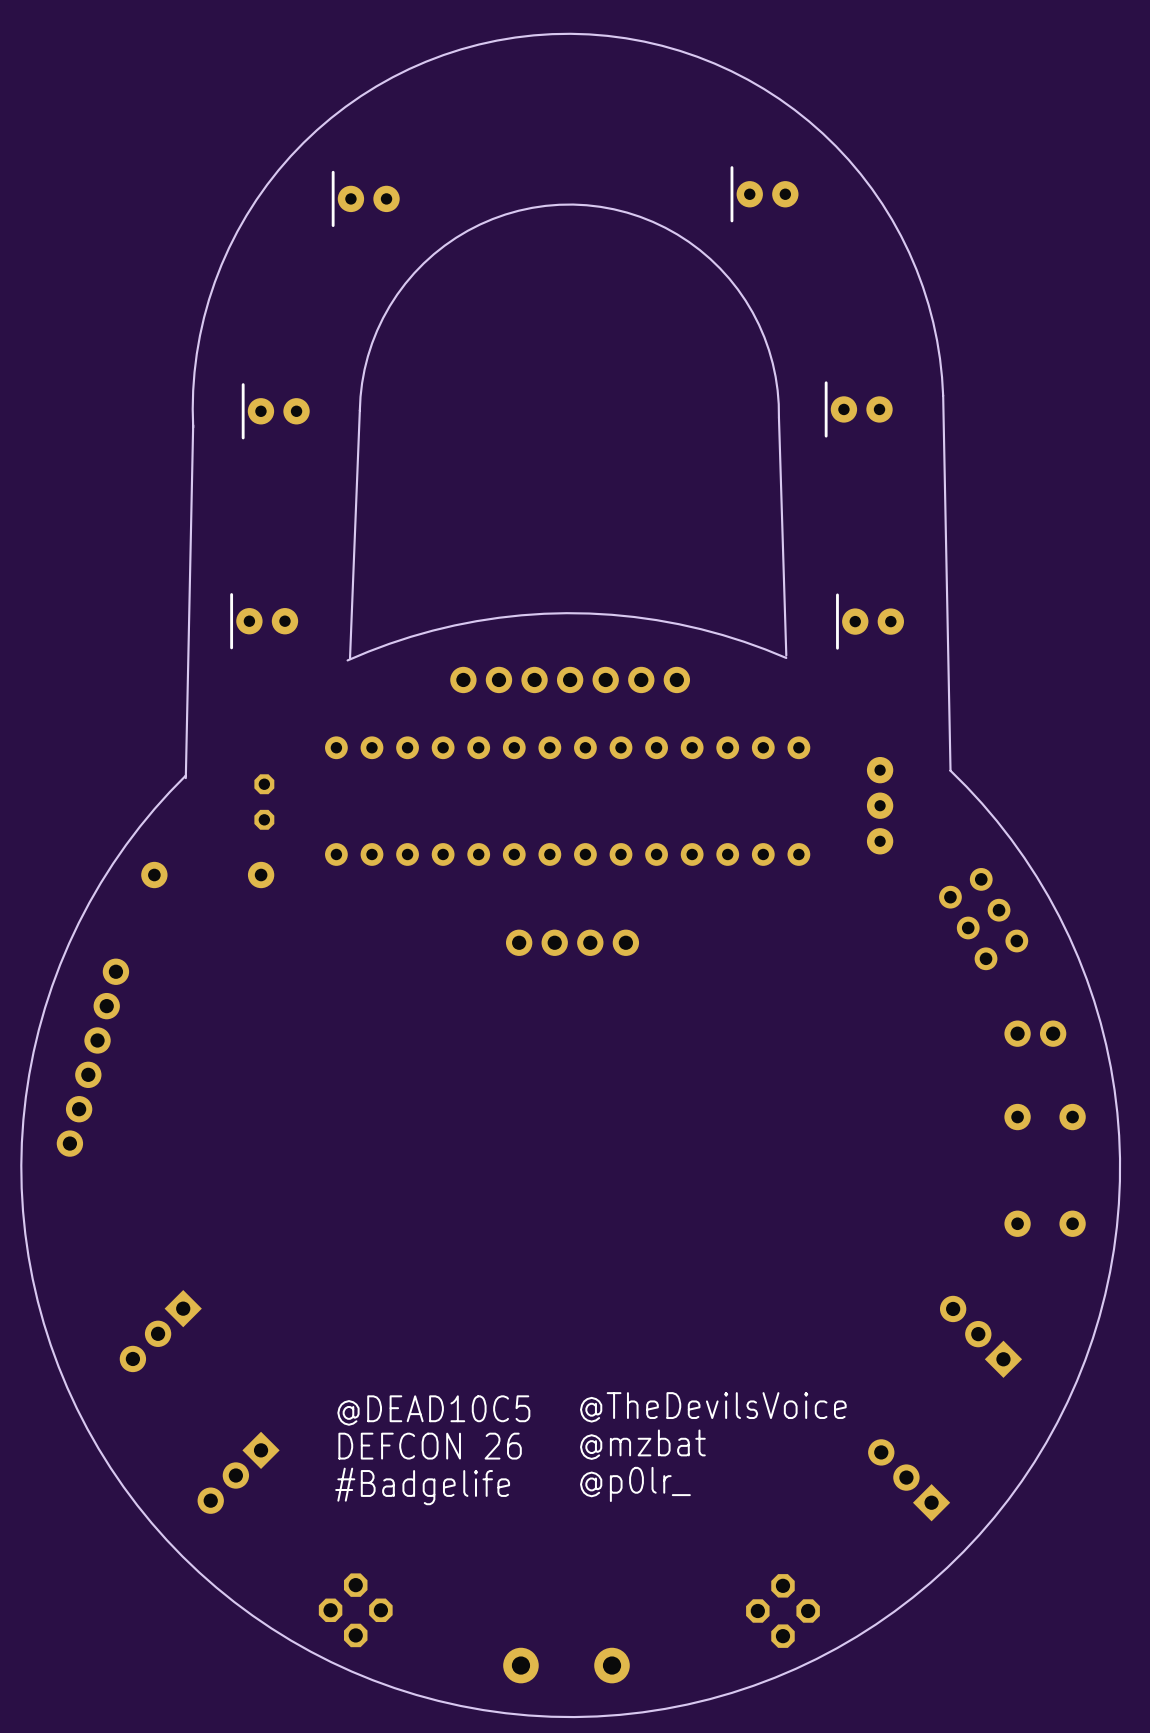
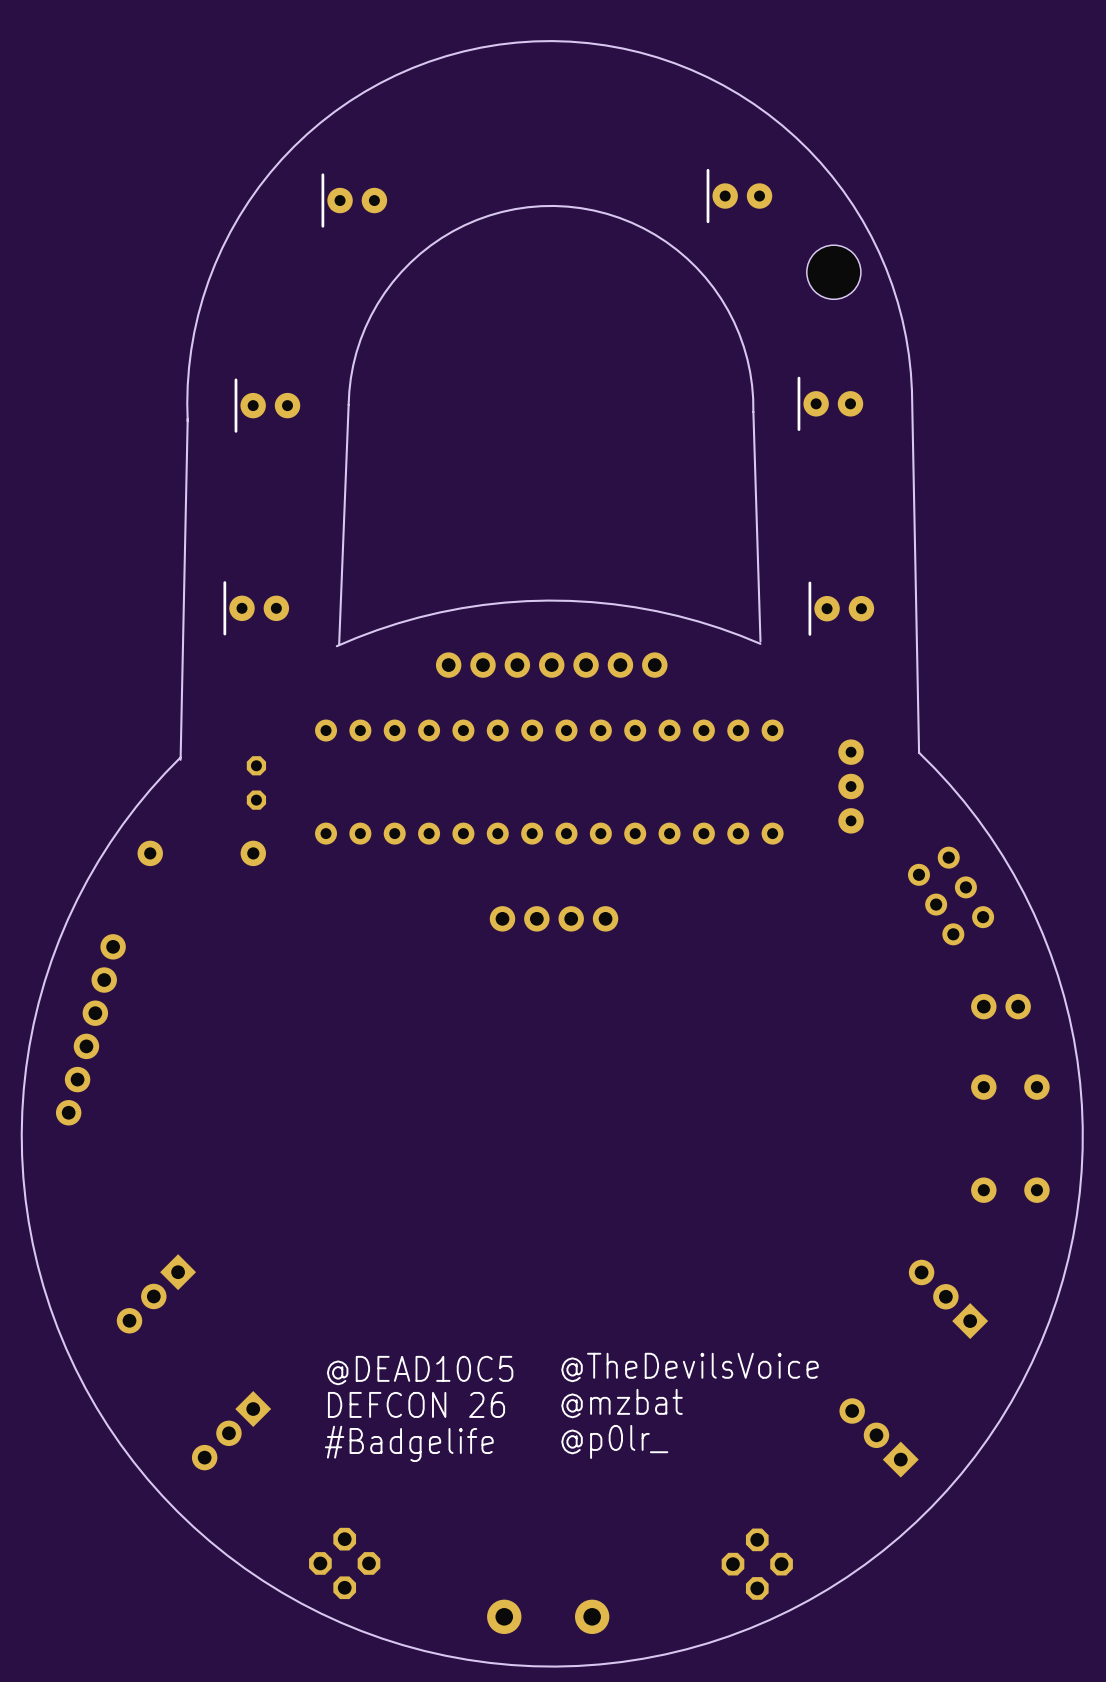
hole: none -> (833, 272)

